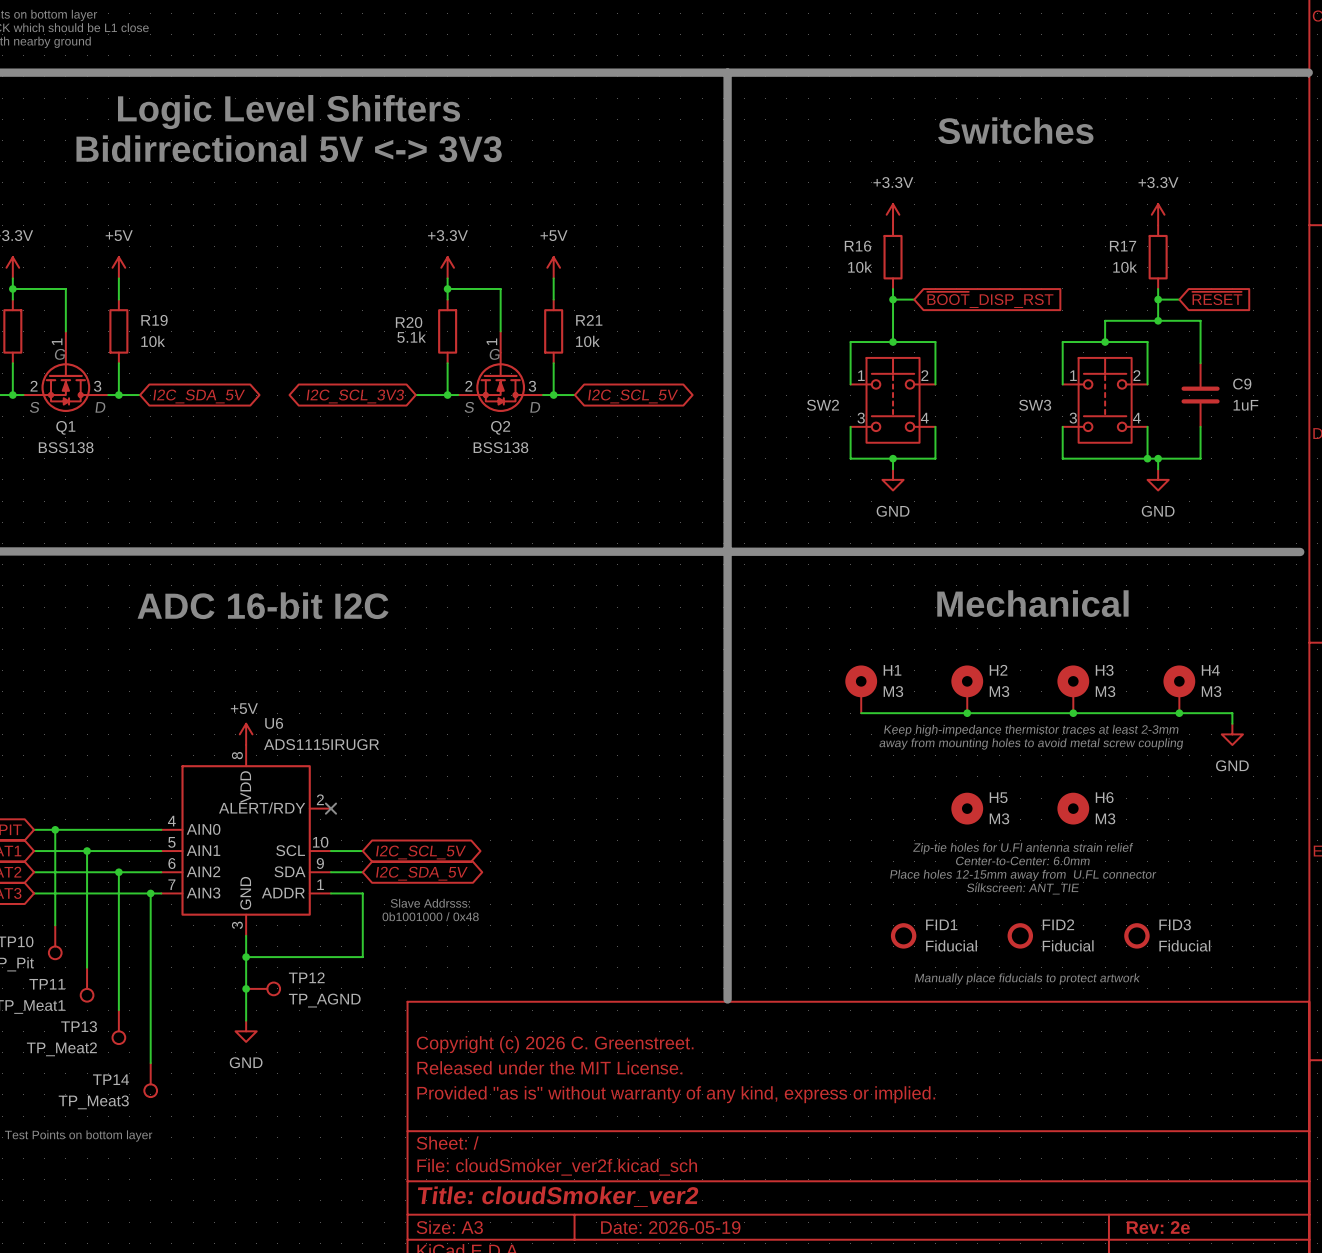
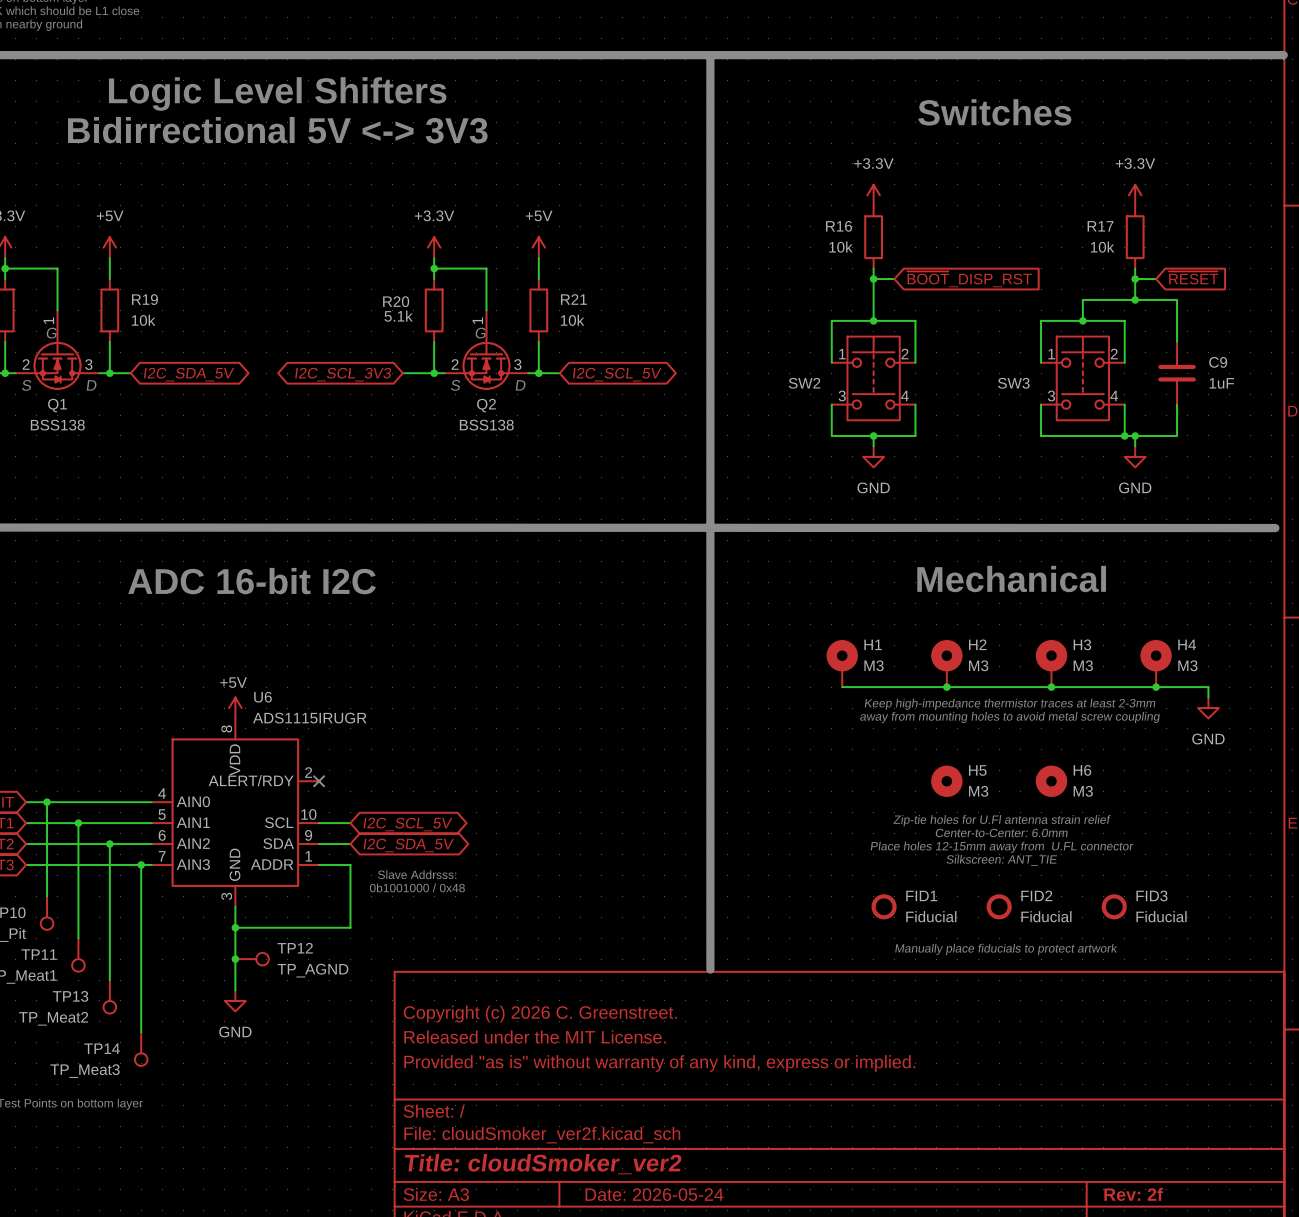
title block: Date: 2026-05-19 (670, 1227) -> Date: 2026-05-24 (654, 1194)
title block: Rev: 2e (1158, 1227) -> Rev: 2f (1133, 1194)

